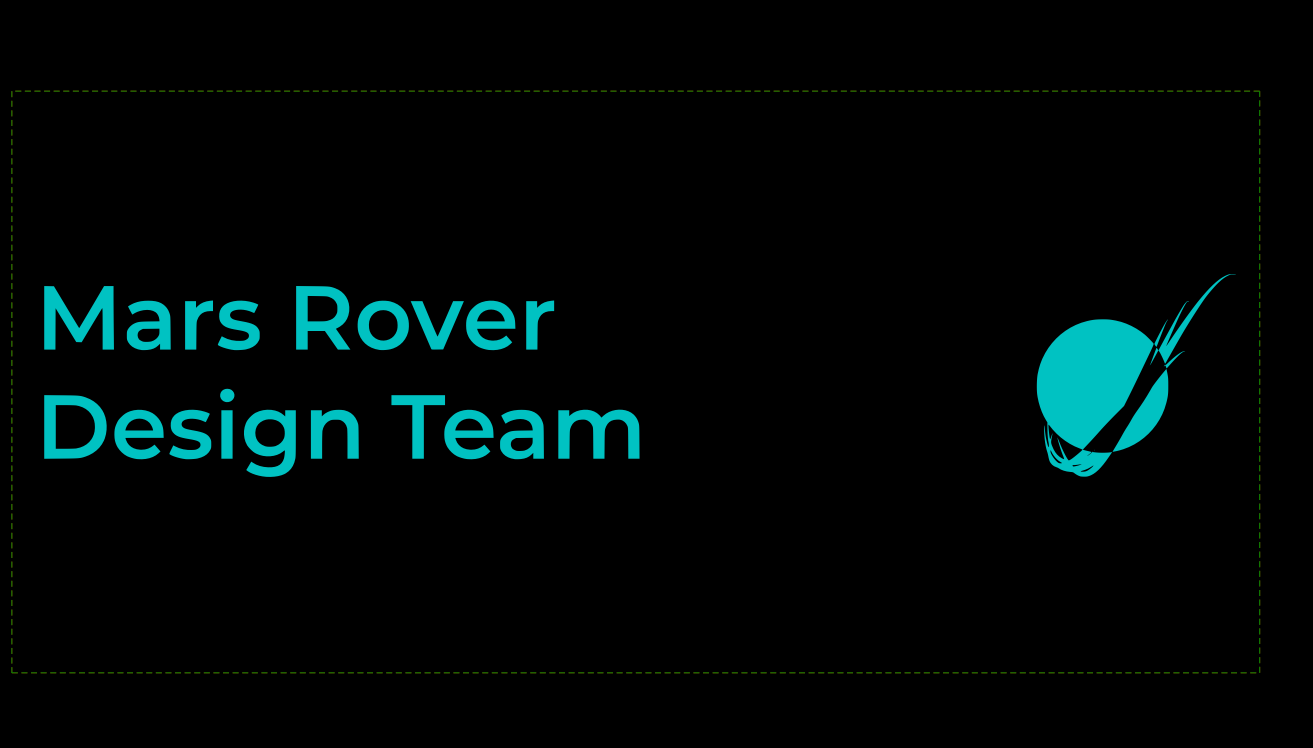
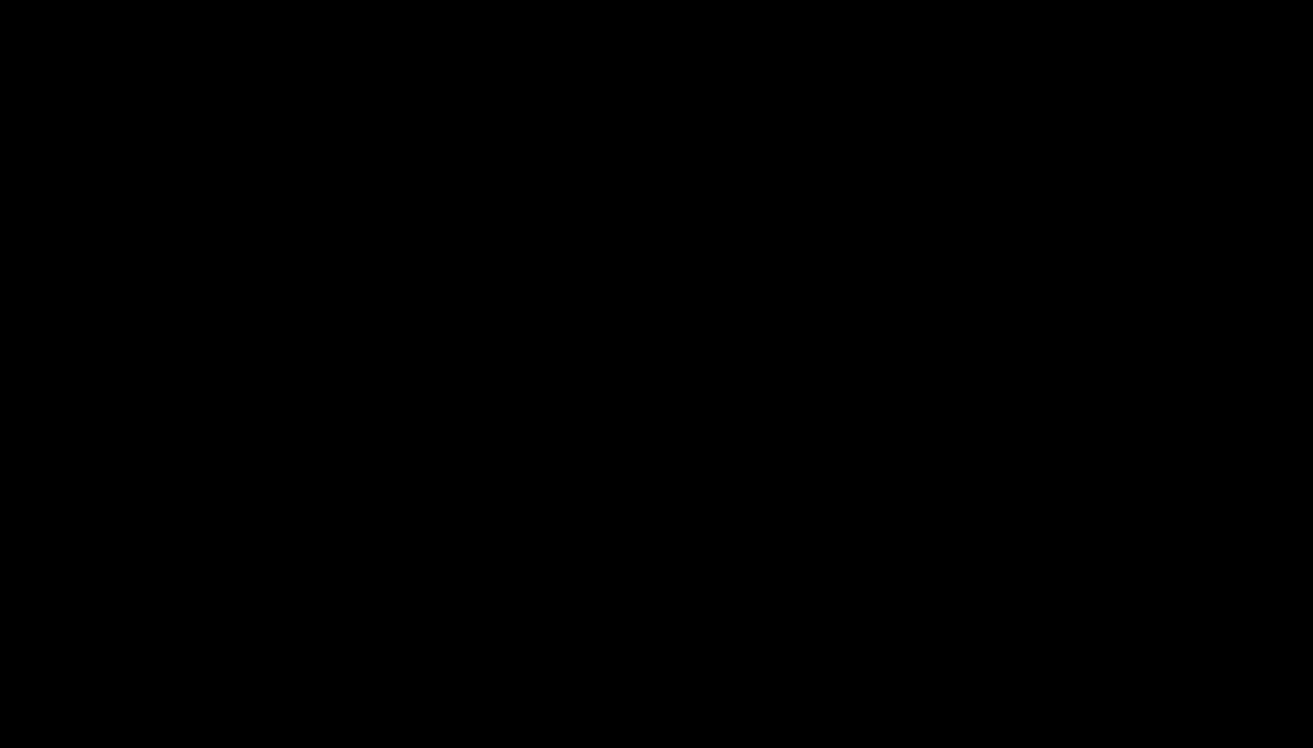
bottom zone outline: (1259, 91) (1259, 672) (11, 672) (11, 91) (1259, 91) -> none
drawing: [1036, 274, 1236, 477] -> none
drawing: [44, 286, 640, 477] -> none

